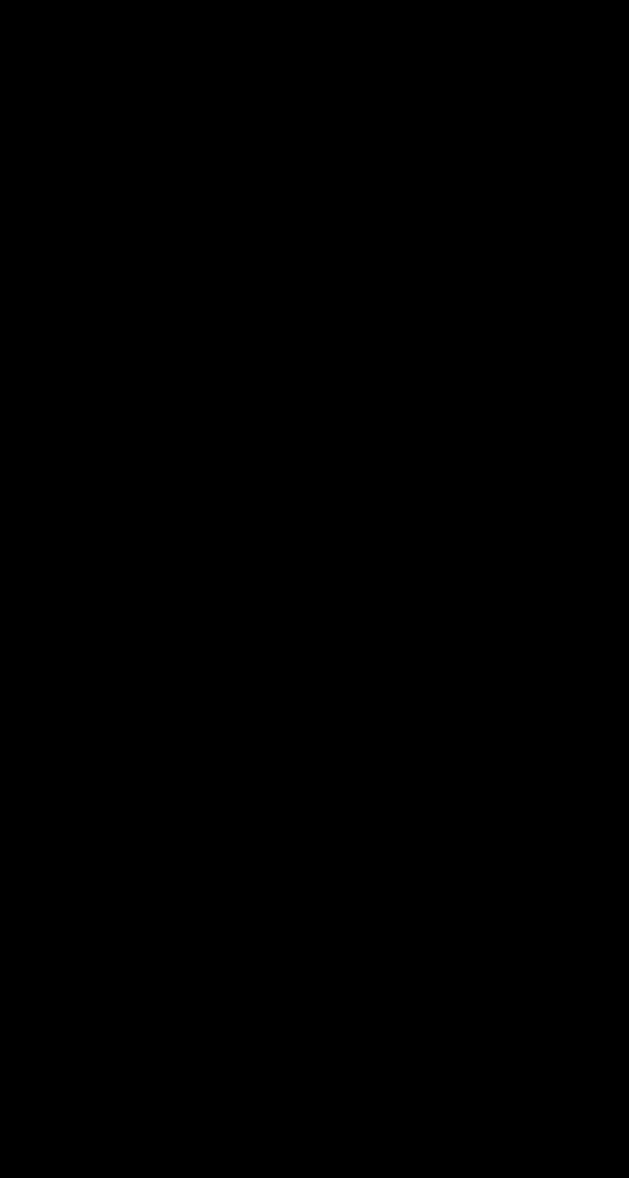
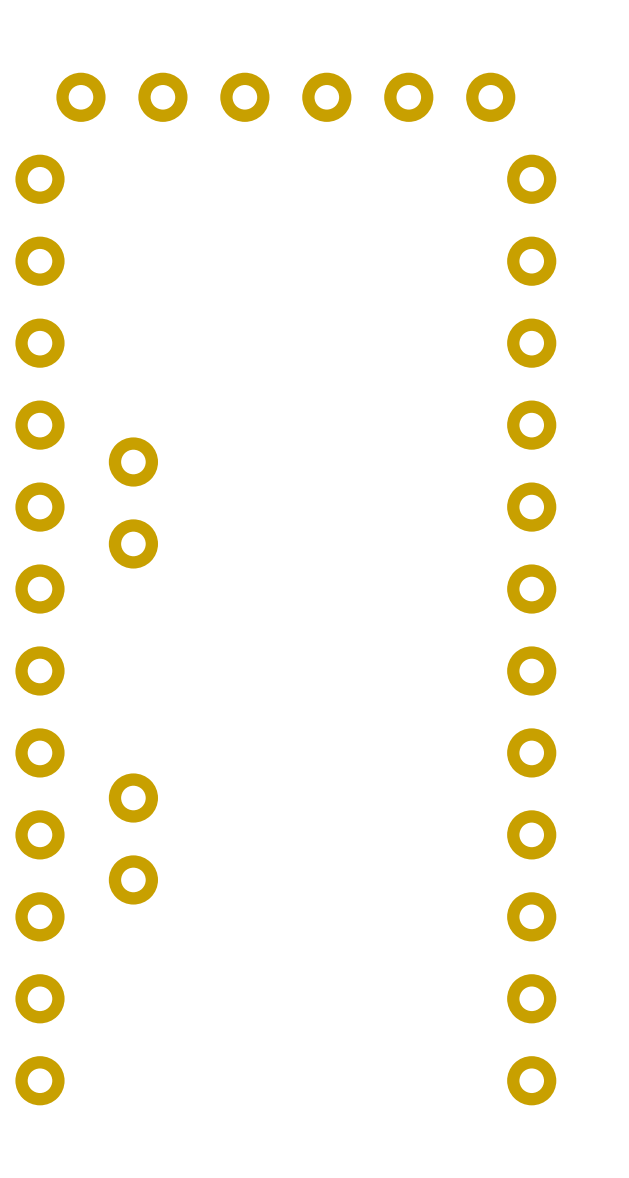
part: none -> (285, 589)

